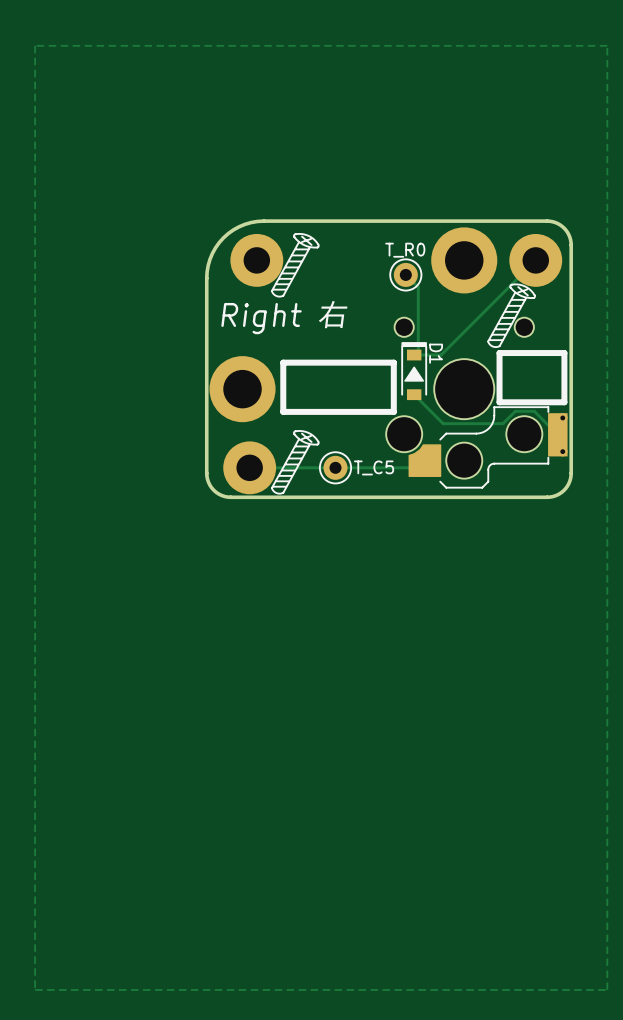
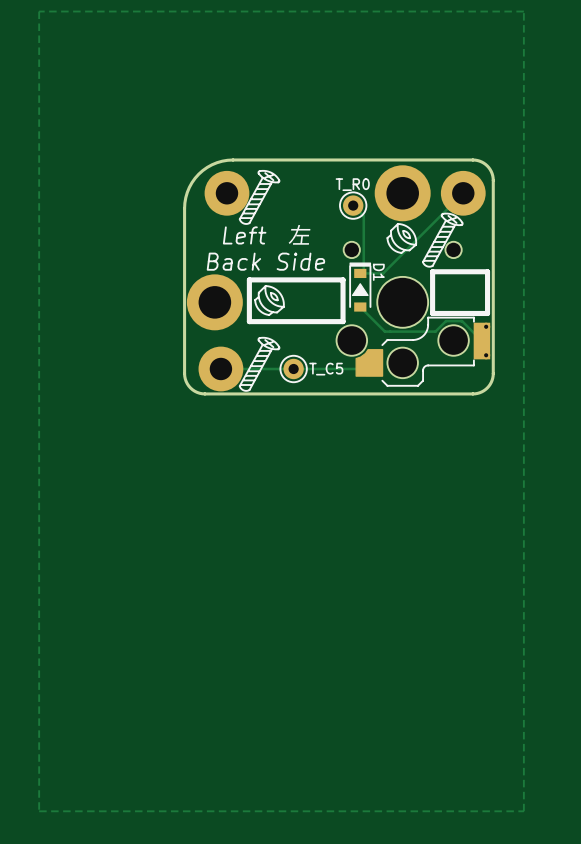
drawing: none -> [386, 223, 417, 254]
text: none -> Left 左 (267, 234)
text: Right 右 (284, 317) -> none
text: none -> Back Side (265, 261)
drawing: none -> [254, 285, 285, 316]

